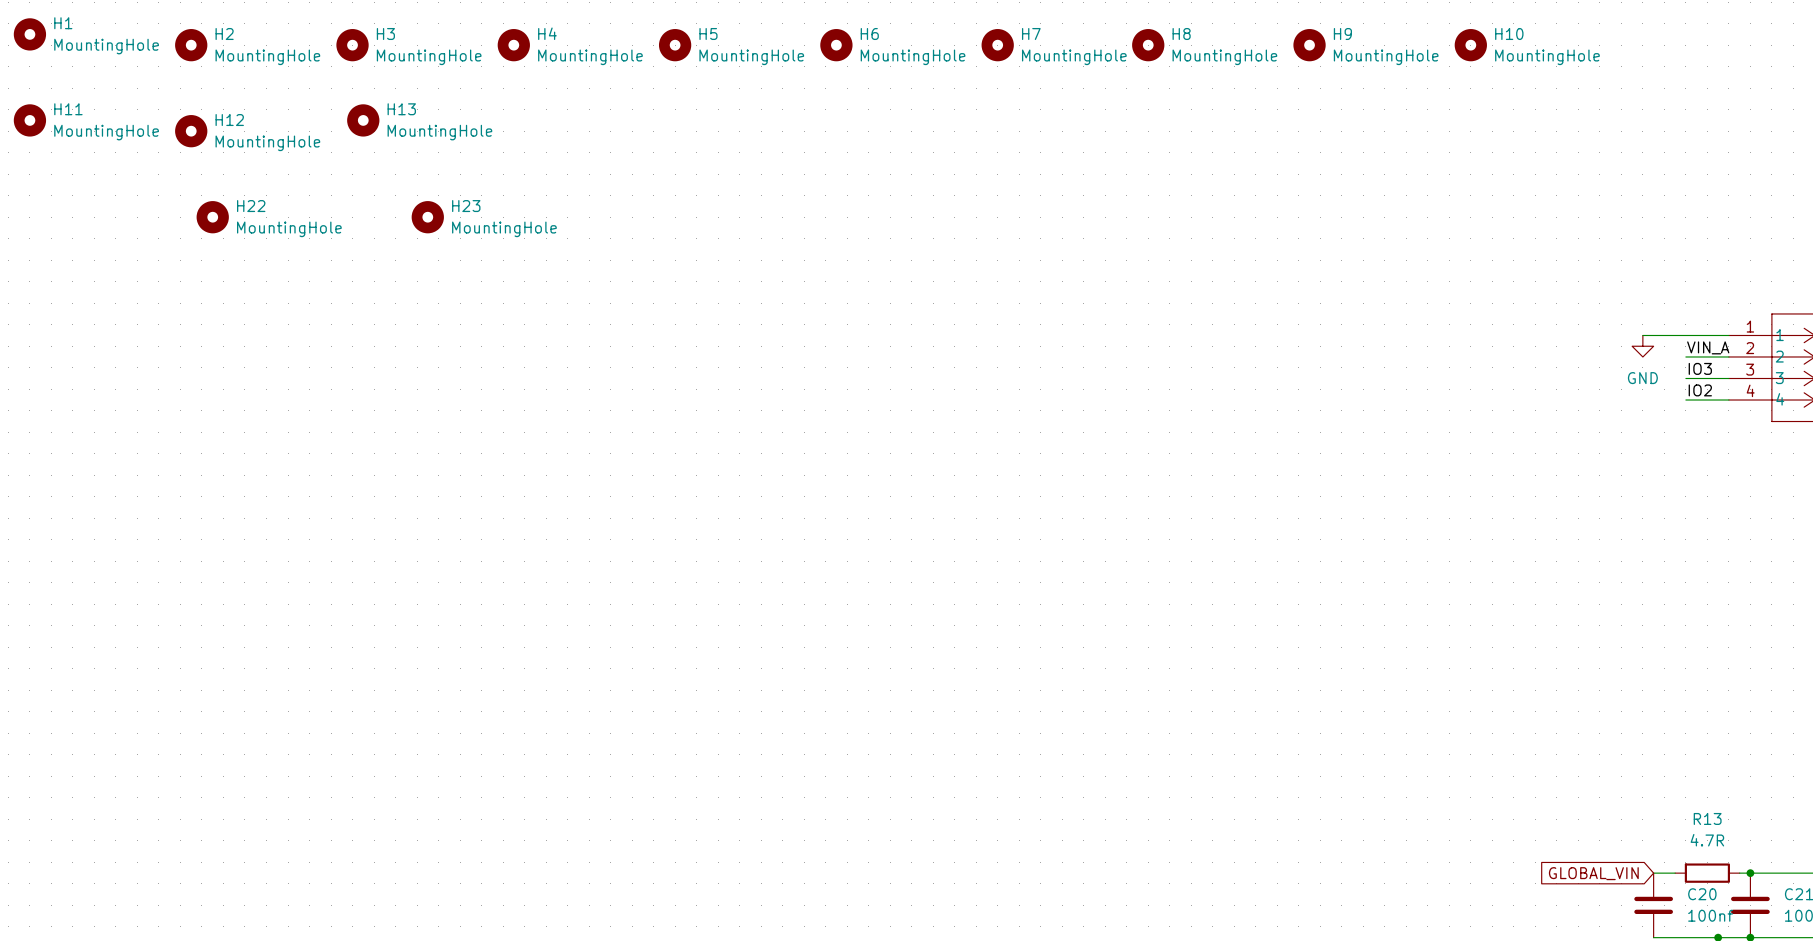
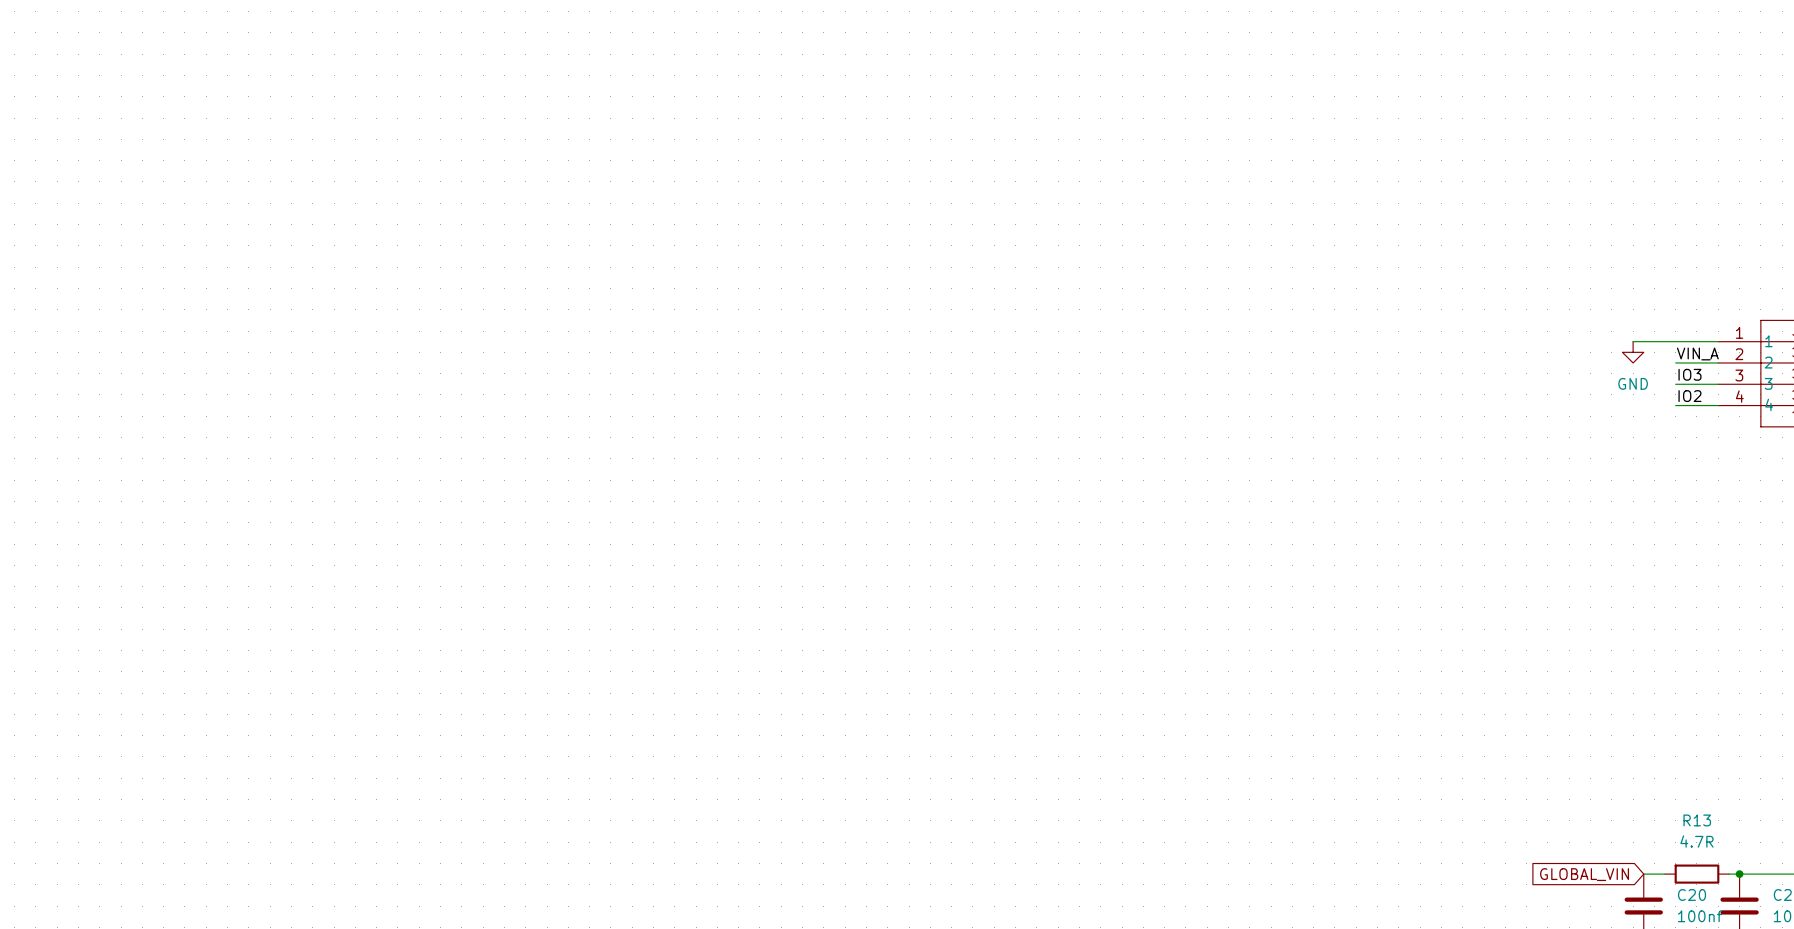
H1: MountingHole (29, 34) -> none
H2: MountingHole (191, 45) -> none
H3: MountingHole (352, 45) -> none
H4: MountingHole (513, 45) -> none
H5: MountingHole (675, 45) -> none
H6: MountingHole (836, 45) -> none
H7: MountingHole (997, 45) -> none
H8: MountingHole (1148, 45) -> none
H9: MountingHole (1309, 45) -> none
H10: MountingHole (1470, 45) -> none
H11: MountingHole (29, 120) -> none
H13: MountingHole (363, 120) -> none
H12: MountingHole (191, 131) -> none
H22: MountingHole (212, 217) -> none
H23: MountingHole (427, 217) -> none

